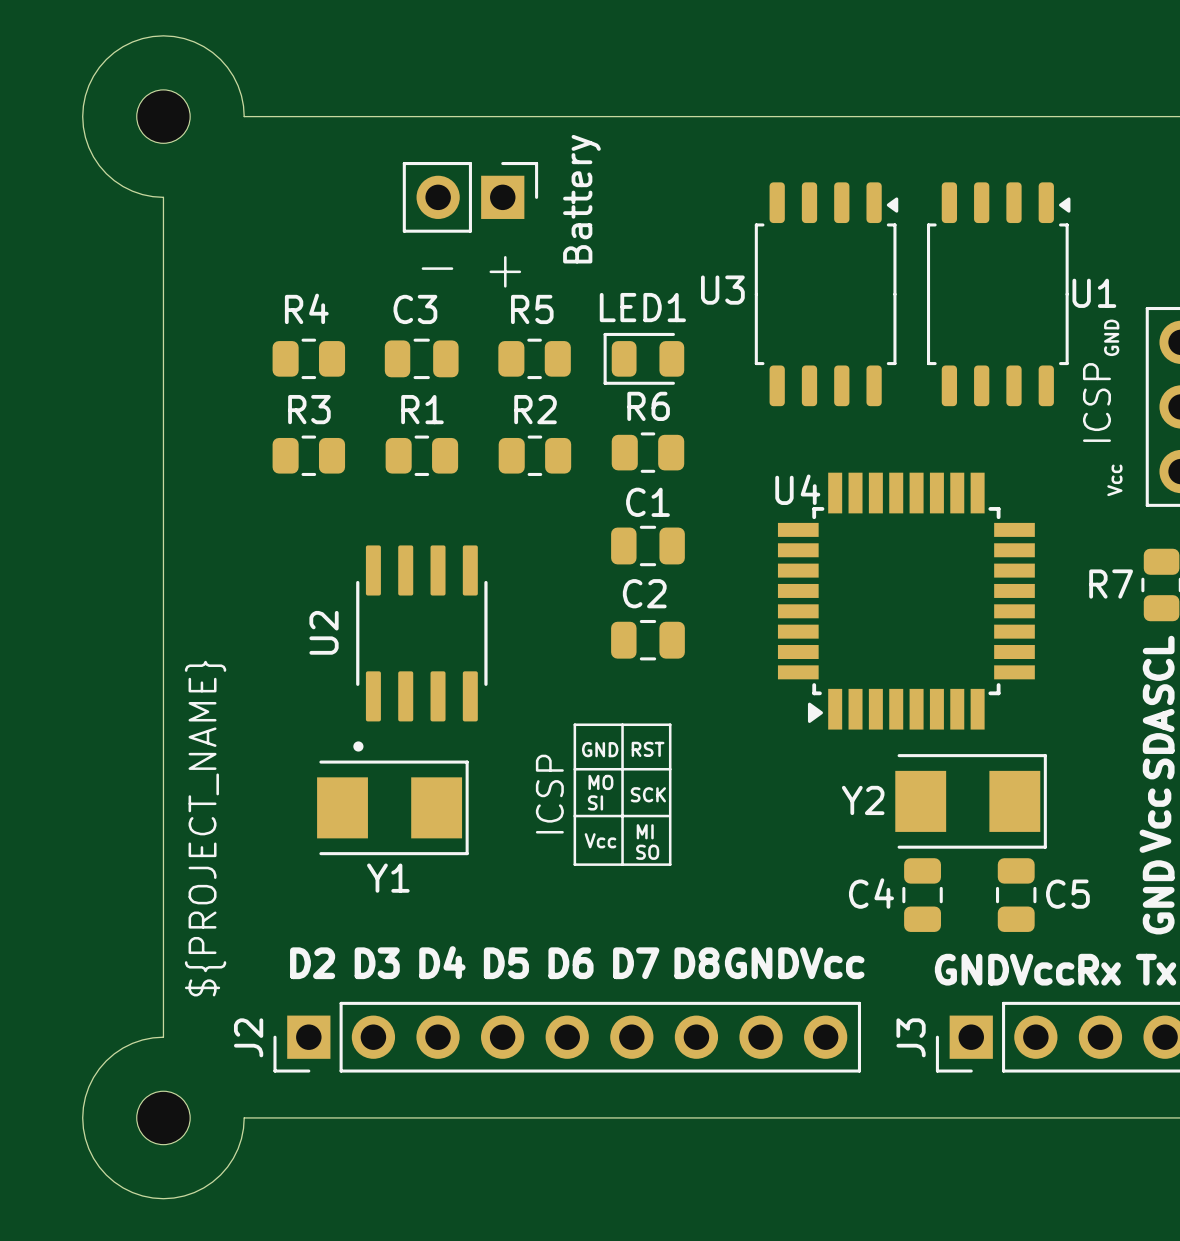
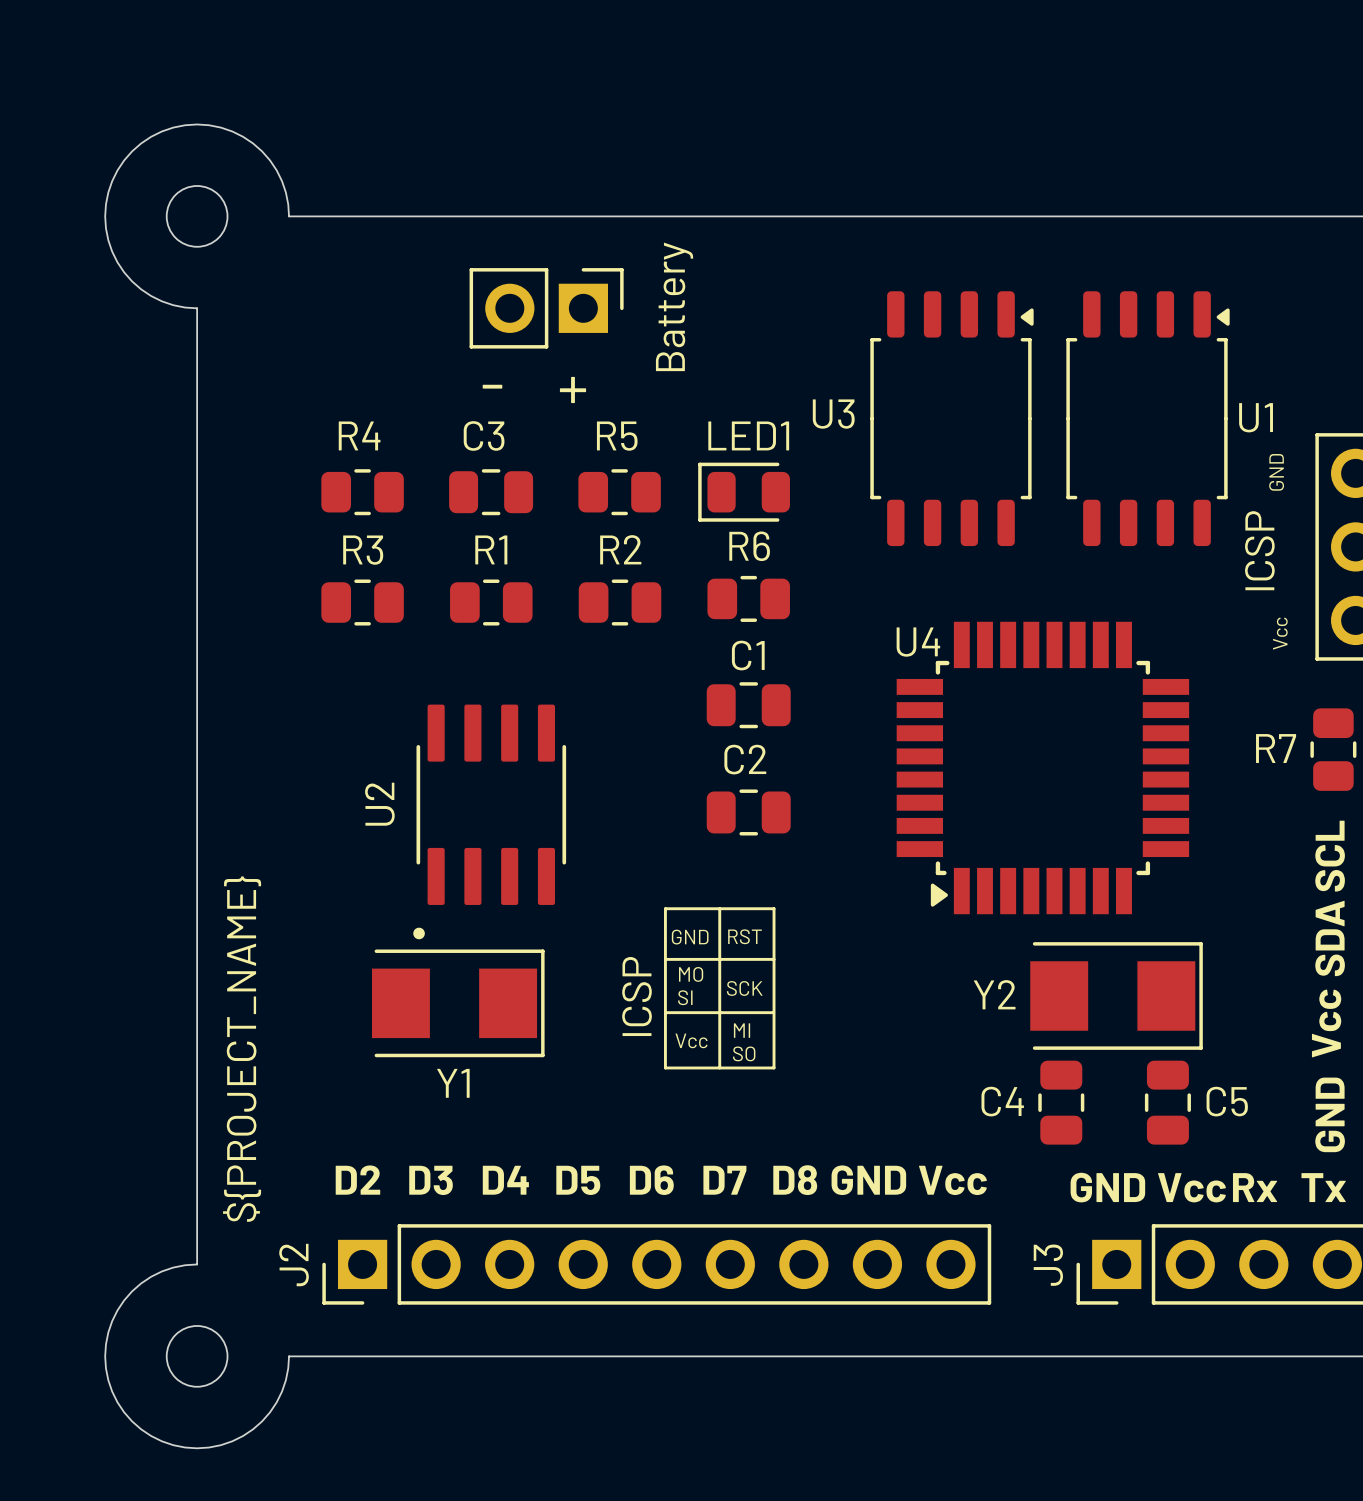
Battery name: none -> Battery (674, 306)
Battery text: Battery (581, 199) -> none
part text: LED1 (642, 307) -> none
part value: none -> LED1 (748, 435)

